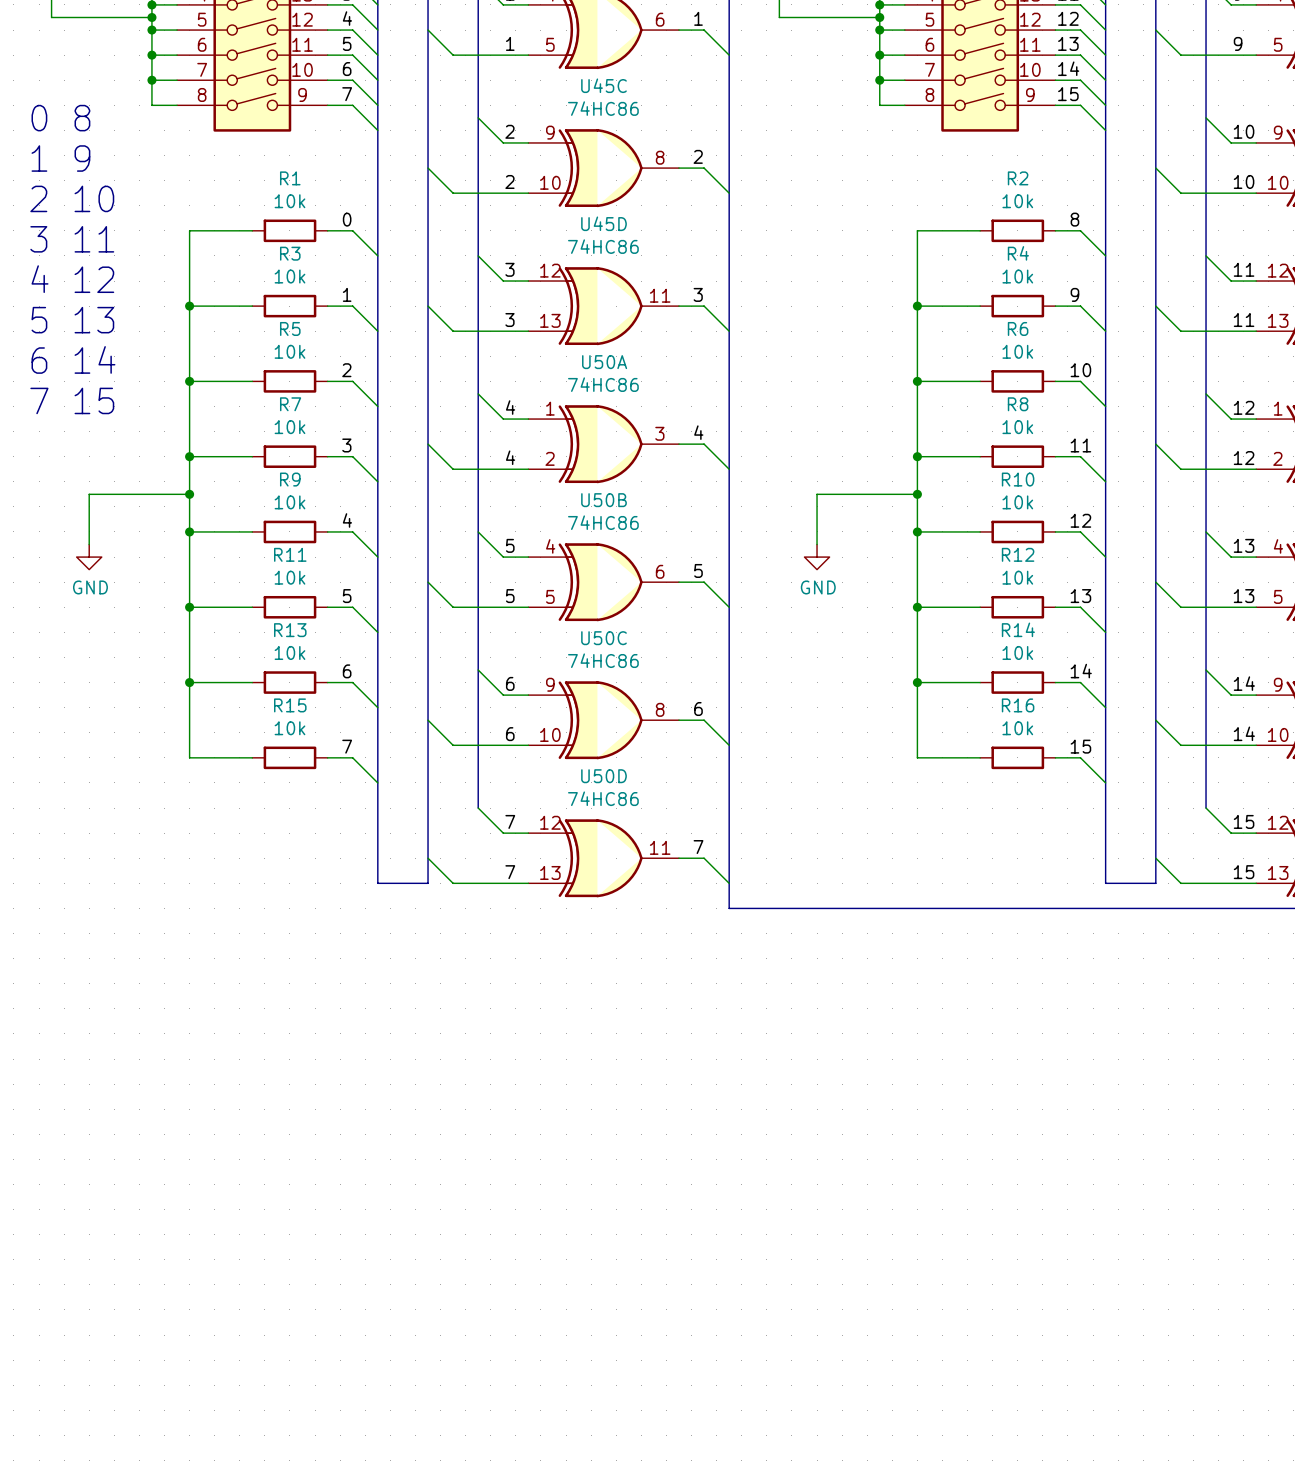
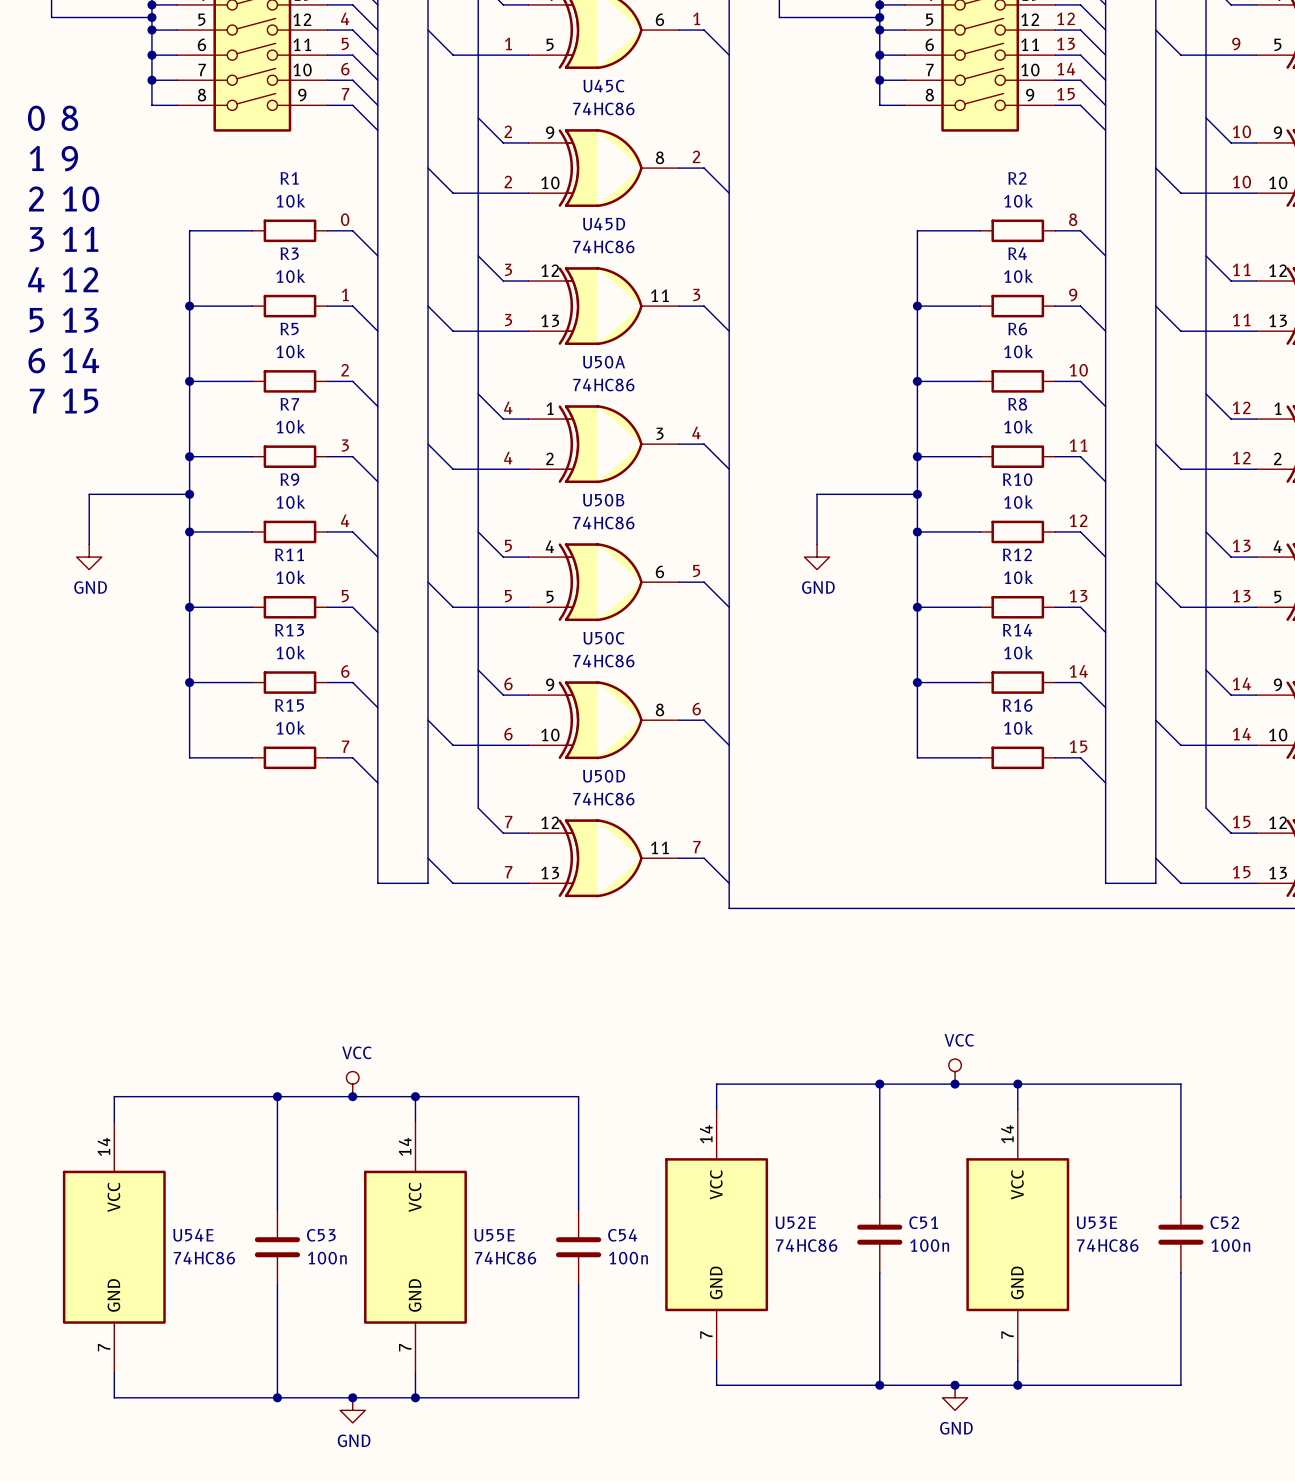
power symbol: none -> VCC (955, 1071)
power symbol: none -> VCC (352, 1084)
wire: none -> (879, 1084) (879, 1197)
junction: none -> (879, 1084)
junction: none -> (955, 1084)
wire: none -> (1017, 1084) (1017, 1109)
junction: none -> (1017, 1084)
wire: none -> (277, 1096) (277, 1209)
junction: none -> (277, 1096)
junction: none -> (352, 1096)
wire: none -> (415, 1096) (415, 1121)
junction: none -> (415, 1096)
wire: none -> (716, 1109) (716, 1084) (1180, 1084) (1180, 1197)
wire: none -> (114, 1121) (114, 1096) (578, 1096) (578, 1209)
U52E: none -> 74HC86 (716, 1234)
C51: none -> 100n (879, 1234)
U53E: none -> 74HC86 (1017, 1234)
C52: none -> 100n (1180, 1234)
U54E: none -> 74HC86 (114, 1247)
C53: none -> 100n (277, 1247)
U55E: none -> 74HC86 (415, 1247)
C54: none -> 100n (578, 1247)
wire: none -> (879, 1272) (879, 1385)
wire: none -> (1180, 1272) (1180, 1385) (716, 1385) (716, 1360)
wire: none -> (277, 1284) (277, 1397)
wire: none -> (578, 1284) (578, 1397) (114, 1397) (114, 1372)
wire: none -> (1017, 1360) (1017, 1385)
wire: none -> (415, 1372) (415, 1397)
junction: none -> (879, 1385)
junction: none -> (955, 1385)
junction: none -> (1017, 1385)
junction: none -> (277, 1397)
junction: none -> (352, 1397)
junction: none -> (415, 1397)
power symbol: none -> GND (955, 1397)
power symbol: none -> GND (352, 1410)

